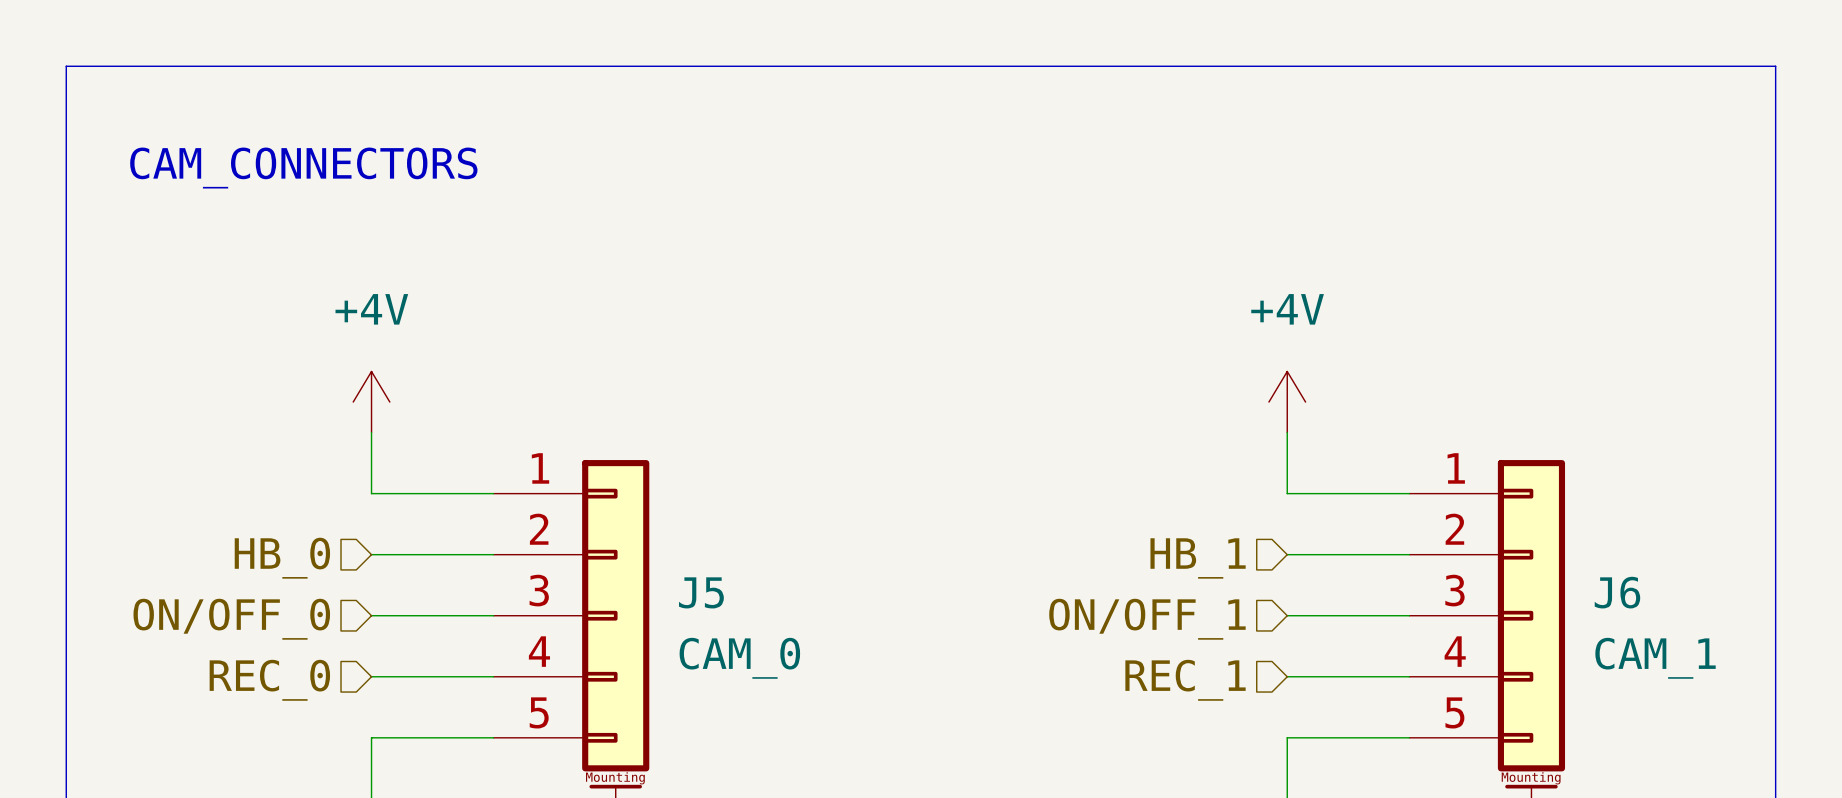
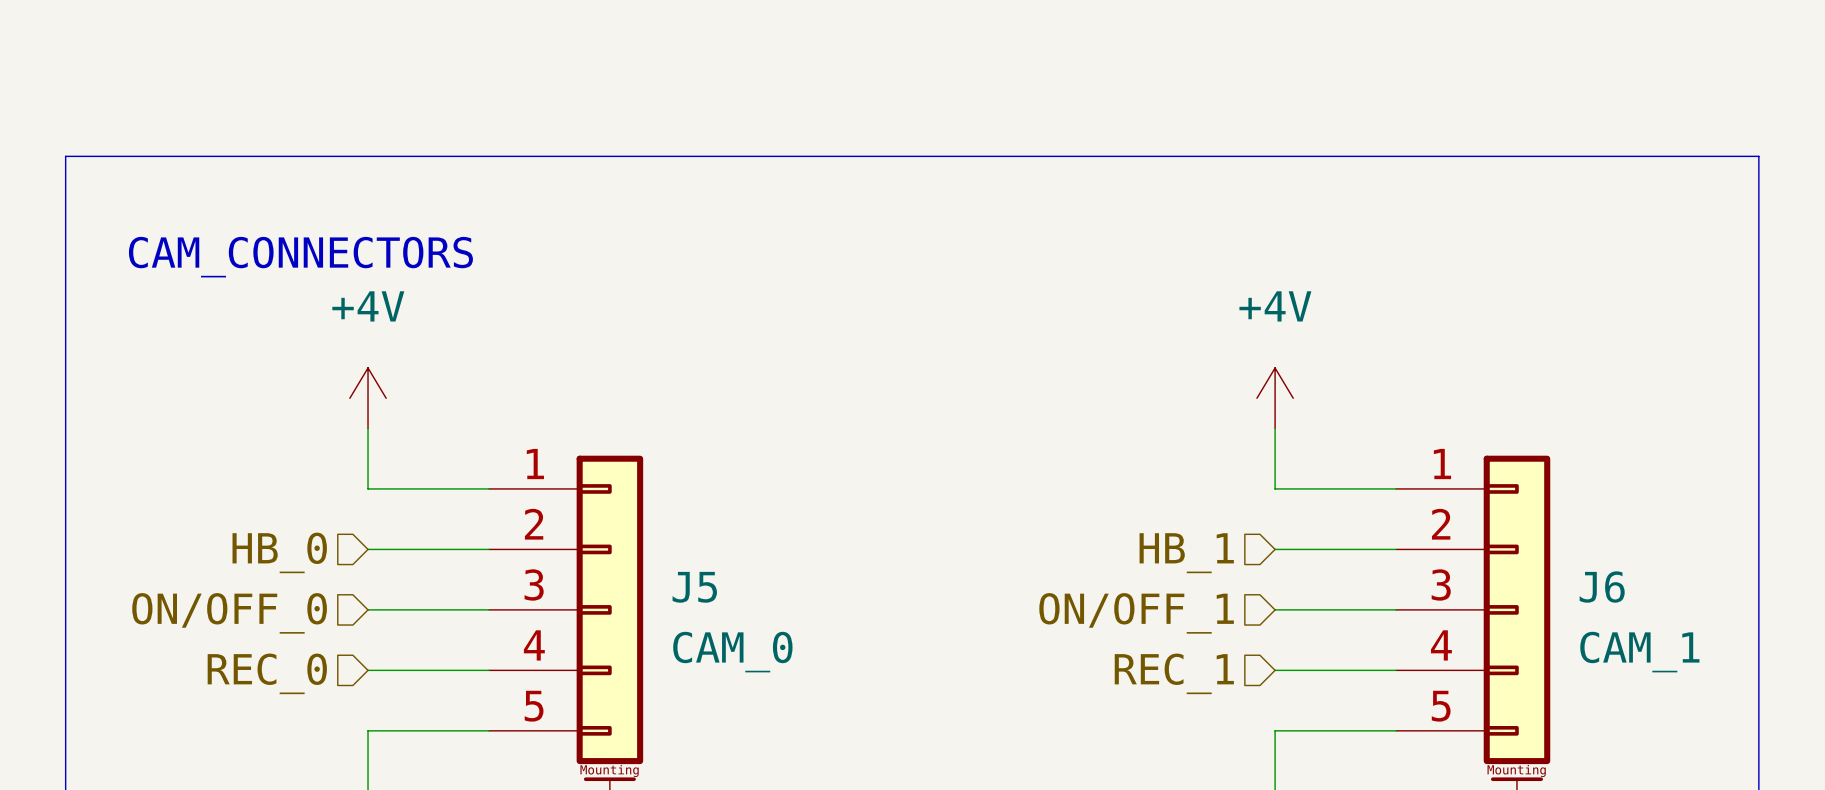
line: (66, 157) (66, 66) (1775, 66) (1775, 157) -> (65, 156) (1758, 156)
text position: CAM_CONNECTORS (303, 168) -> CAM_CONNECTORS (300, 257)

